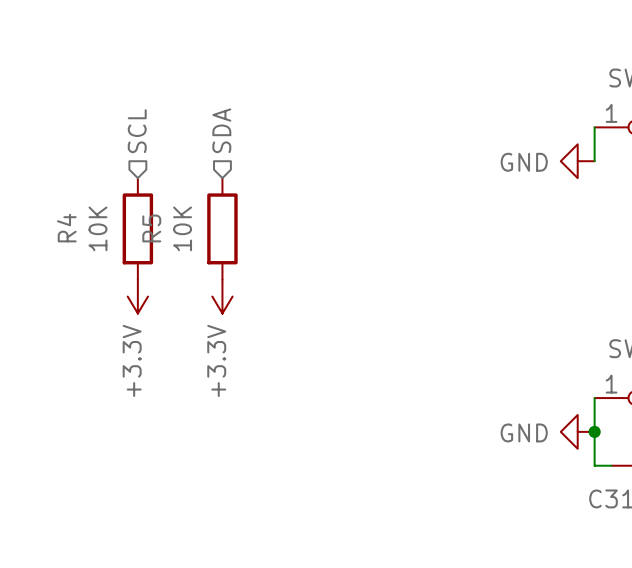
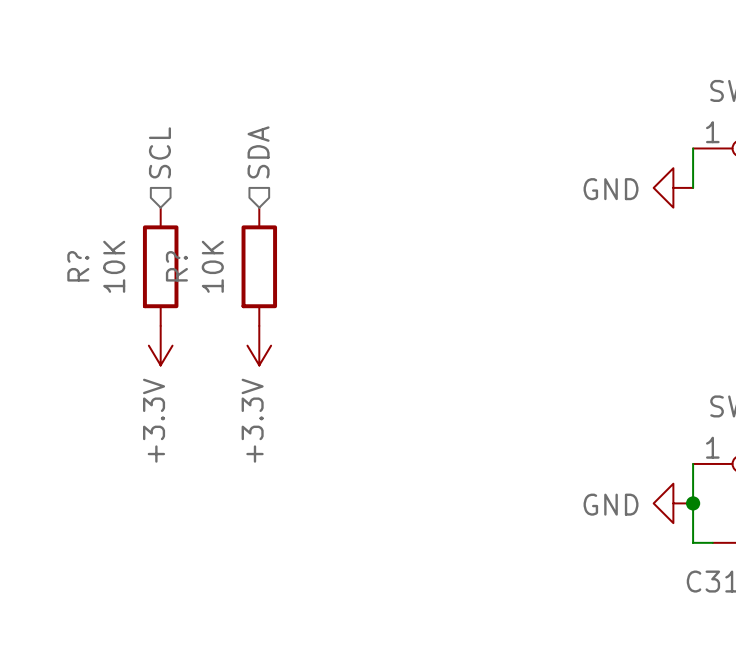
R4 name: R4 (66, 228) -> R? (78, 266)
R5 name: R5 (151, 228) -> R? (176, 266)

